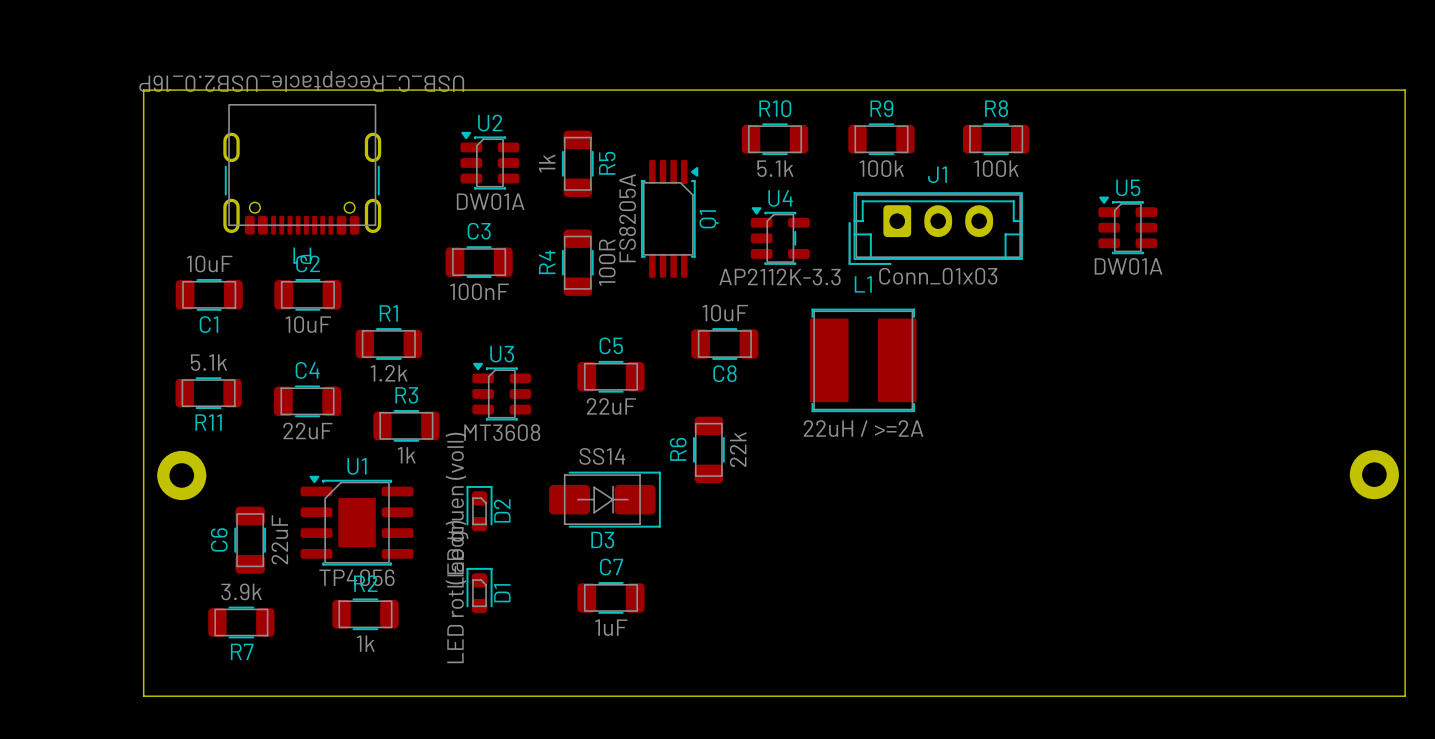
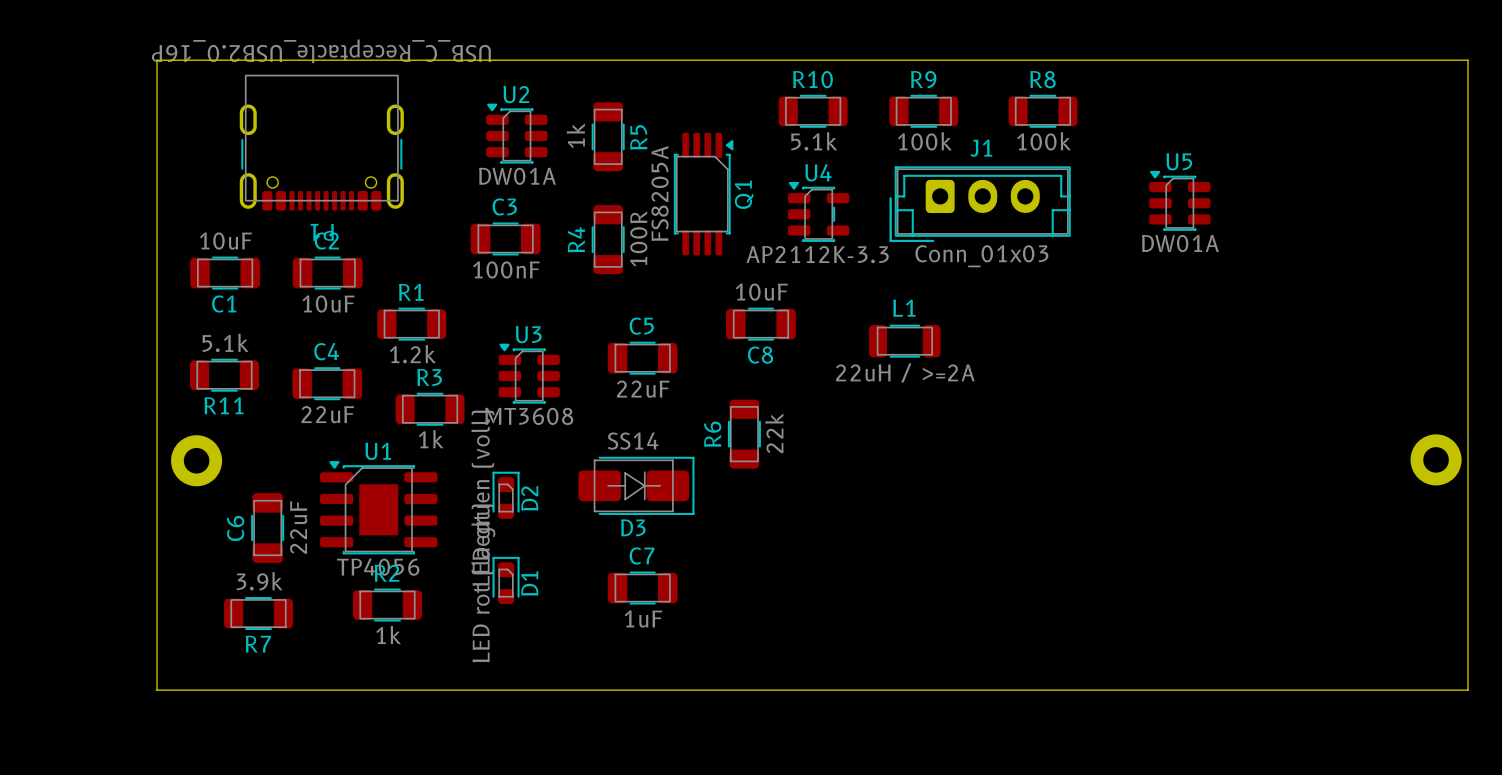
L1 name position: L1 (863, 284) -> L1 (904, 308)
L1 footprint: [810, 308, 917, 413] -> [869, 324, 941, 358]
L1 value position: 22uH / >=2A (863, 428) -> 22uH / >=2A (905, 372)

